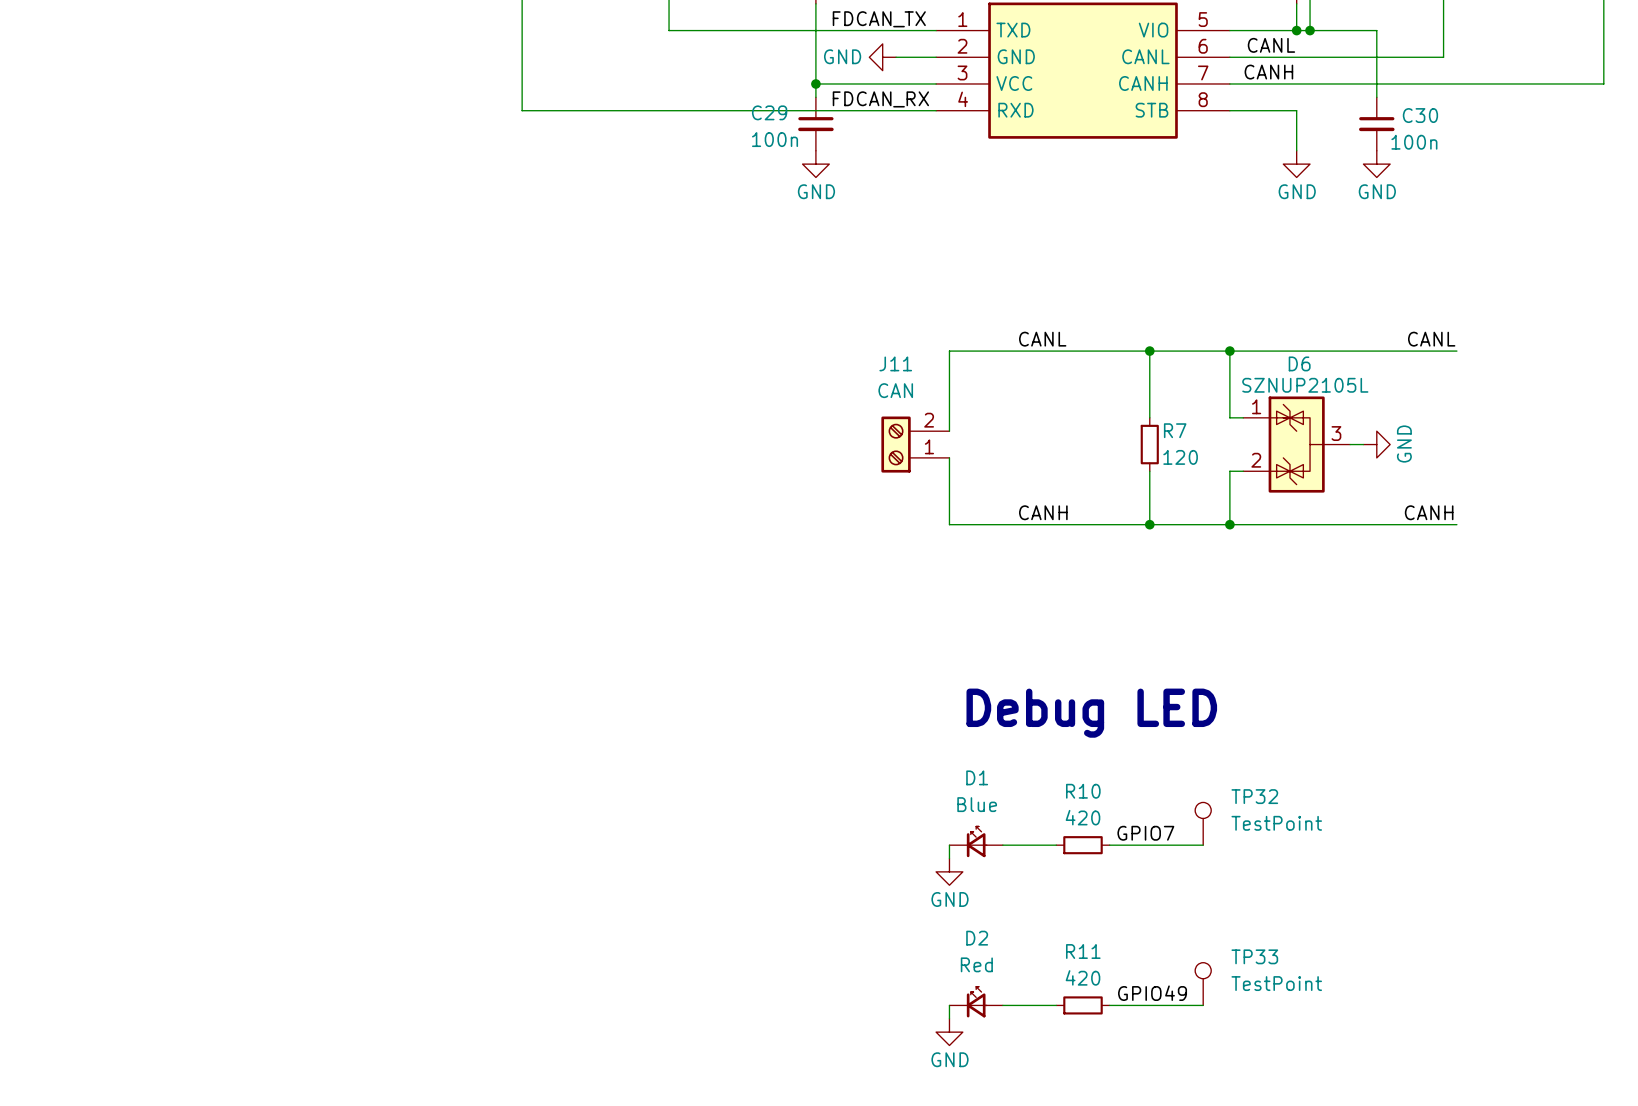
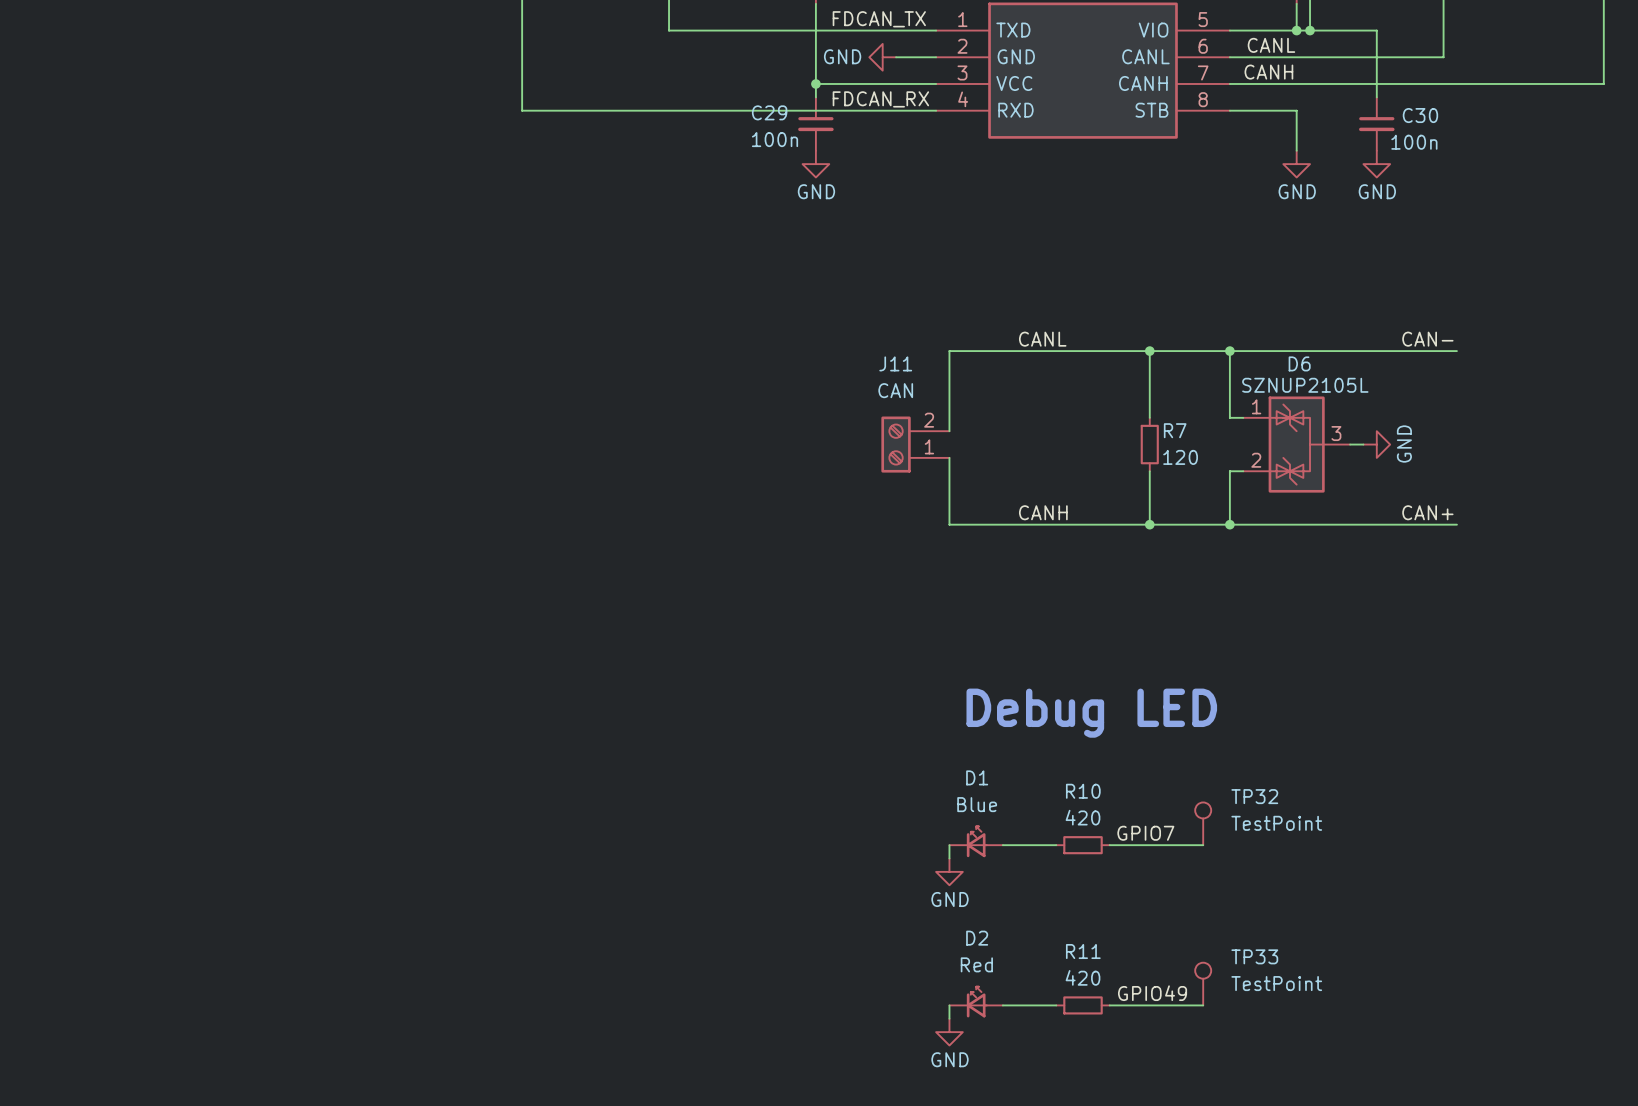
label: CANL (1431, 339) -> CAN- (1427, 339)
label: CANH (1429, 512) -> CAN+ (1427, 512)

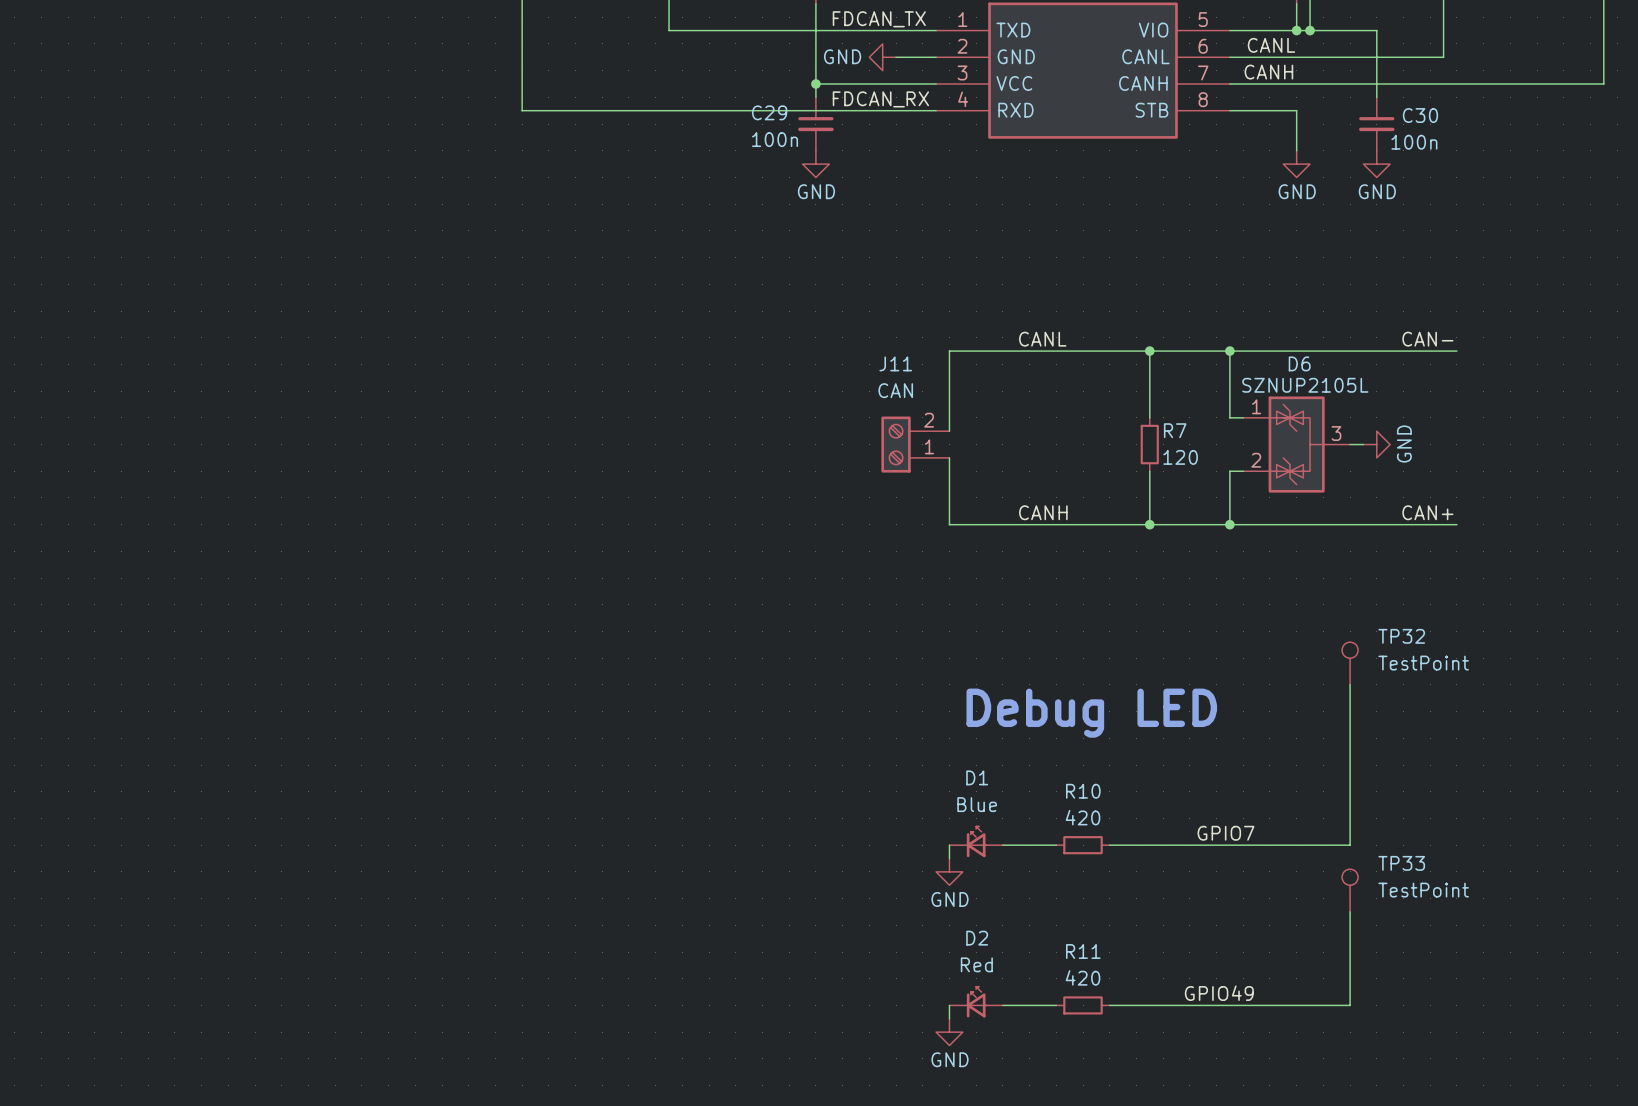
wire: none -> (1350, 684) (1350, 845) (1203, 845)
TP32 position: (1203, 823) -> (1350, 663)
label position: GPIO7 (1145, 833) -> GPIO7 (1225, 833)
wire: none -> (1350, 911) (1350, 1005) (1203, 1005)
TP33 position: (1203, 984) -> (1350, 890)
label position: GPIO49 (1152, 993) -> GPIO49 (1219, 993)

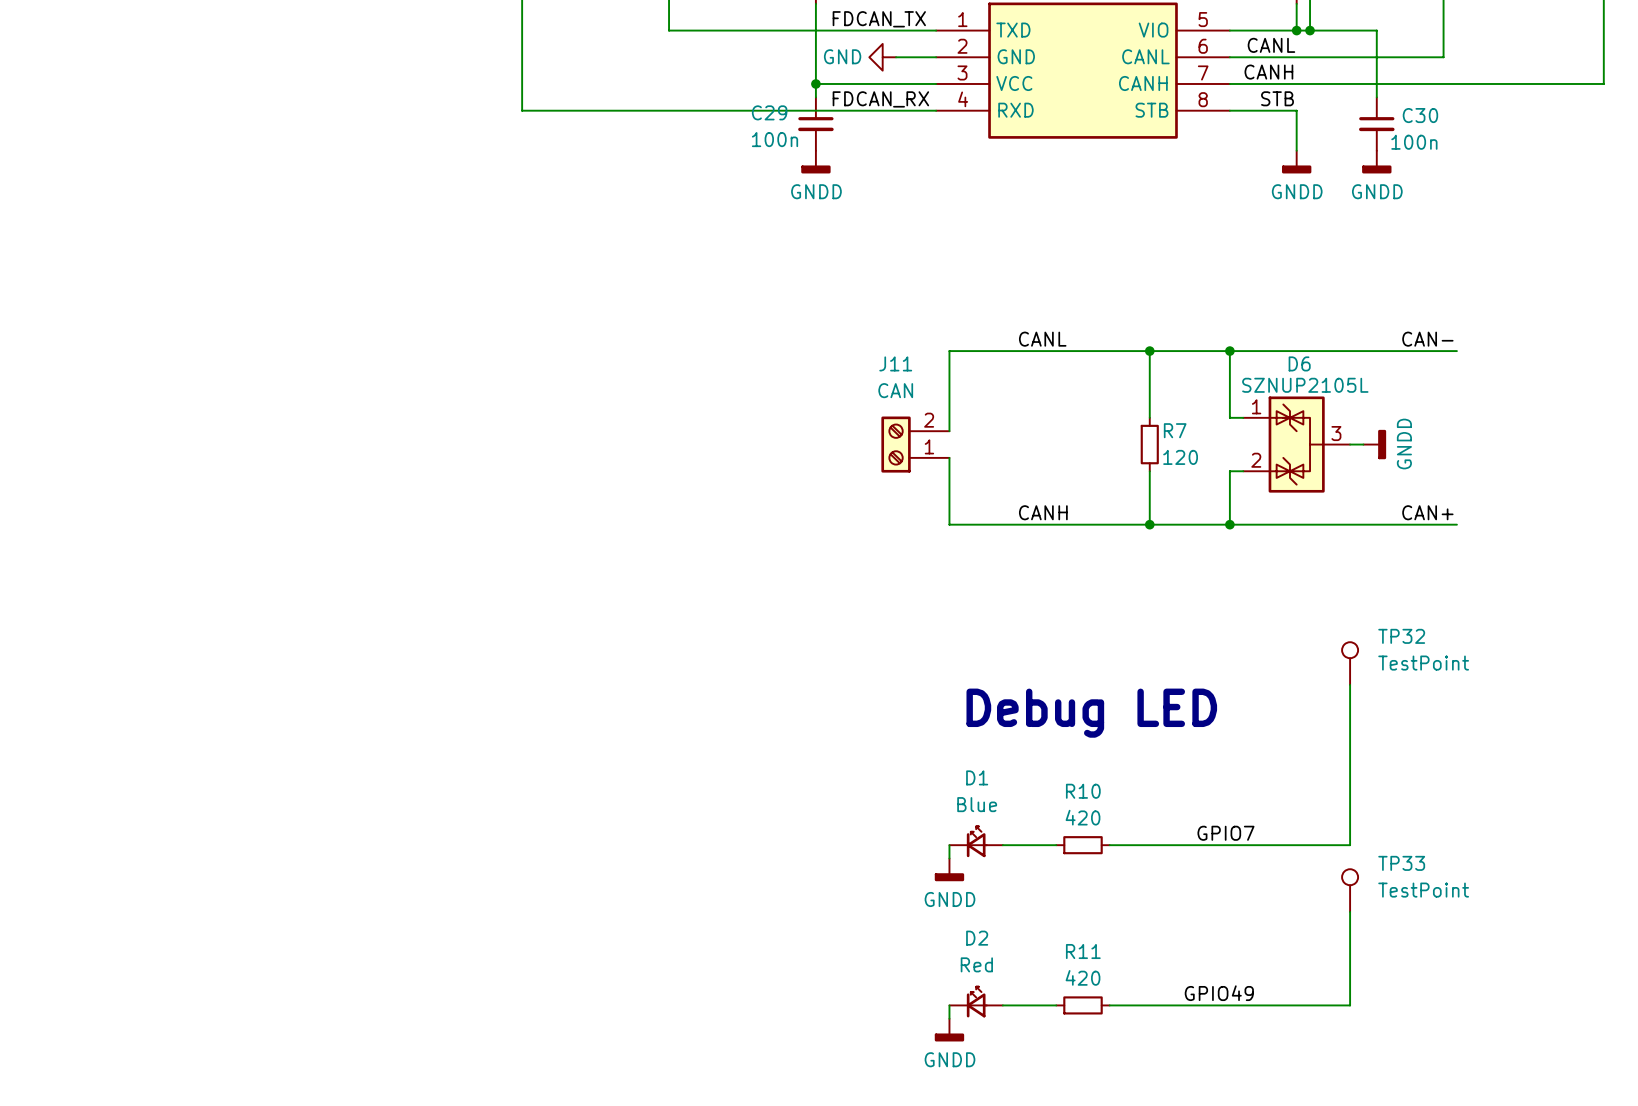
label: none -> STB (1277, 98)
power symbol: GND (815, 164) -> GNDD (815, 162)
power symbol: GND (1296, 164) -> GNDD (1296, 162)
power symbol: GND (1376, 164) -> GNDD (1376, 162)
power symbol: GND (1376, 444) -> GNDD (1374, 444)
power symbol: GND (949, 871) -> GNDD (949, 869)
power symbol: GND (949, 1032) -> GNDD (949, 1030)

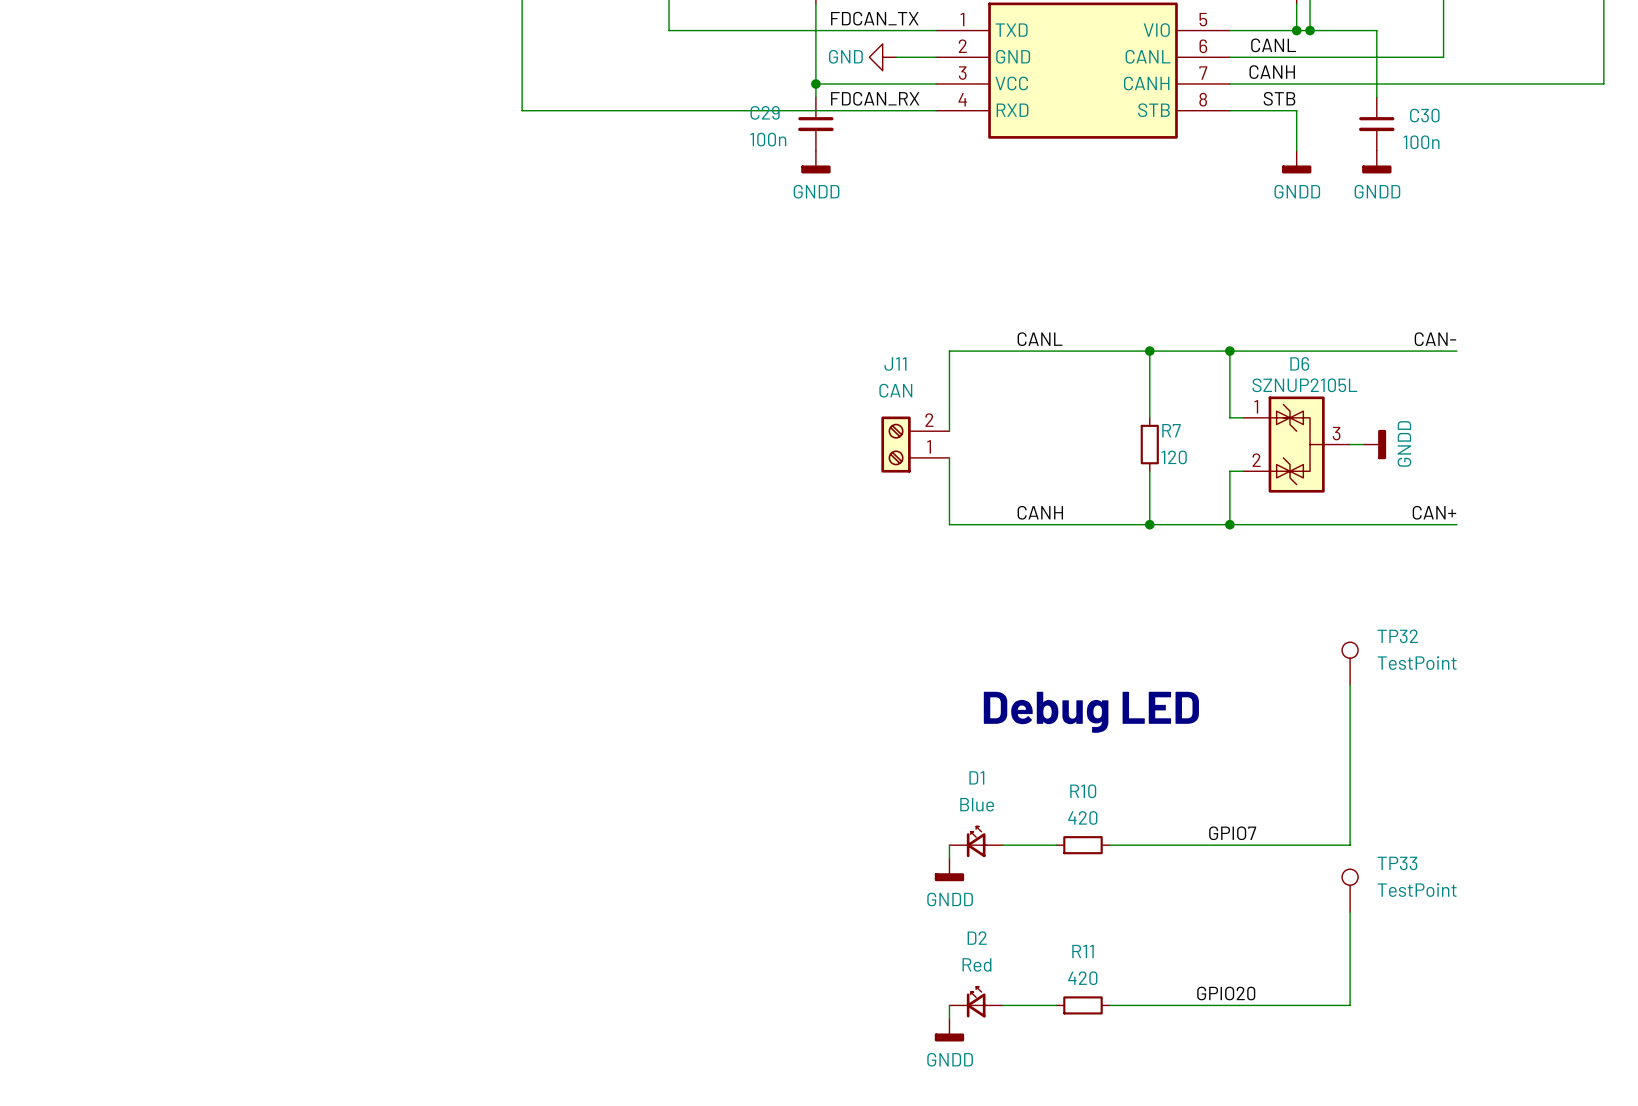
label: GPIO49 (1219, 993) -> GPIO20 (1226, 993)

